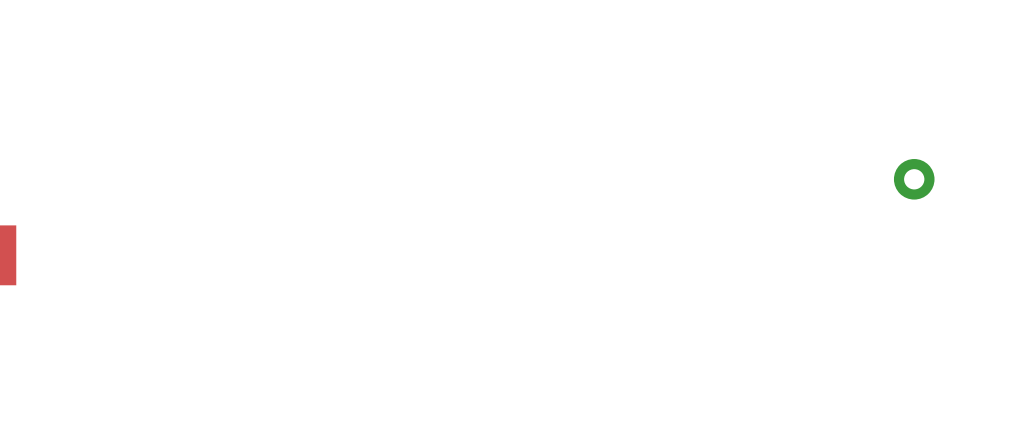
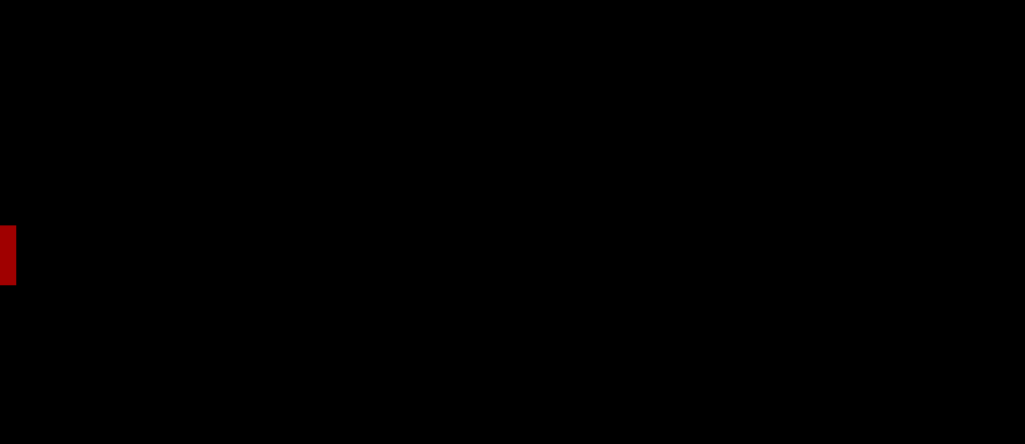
via: (914, 179) -> none

